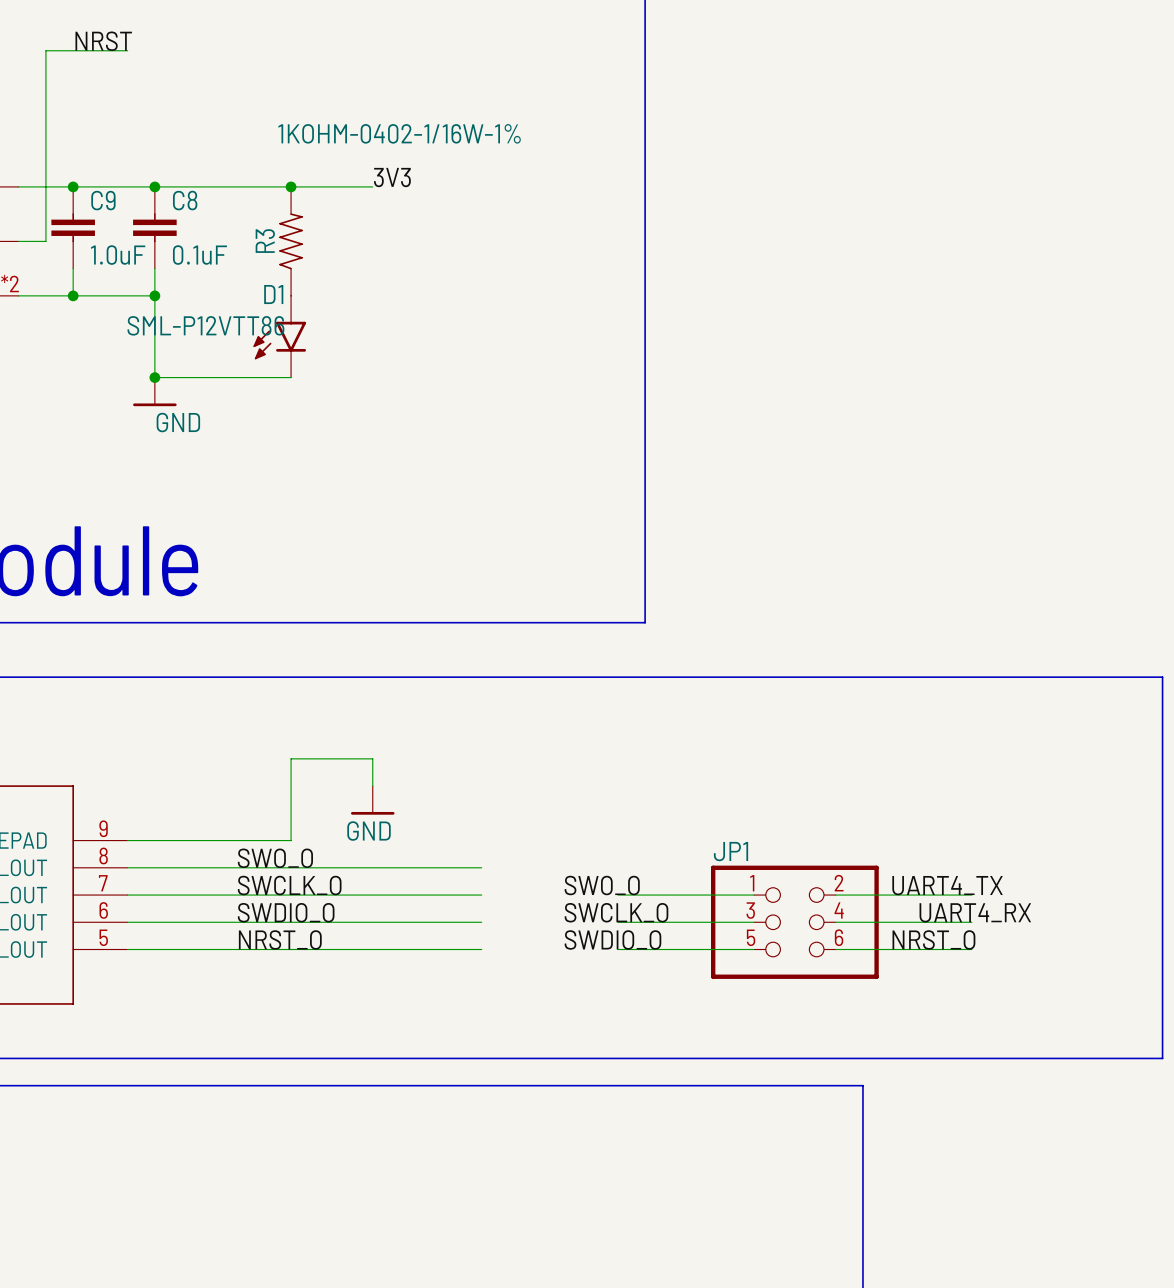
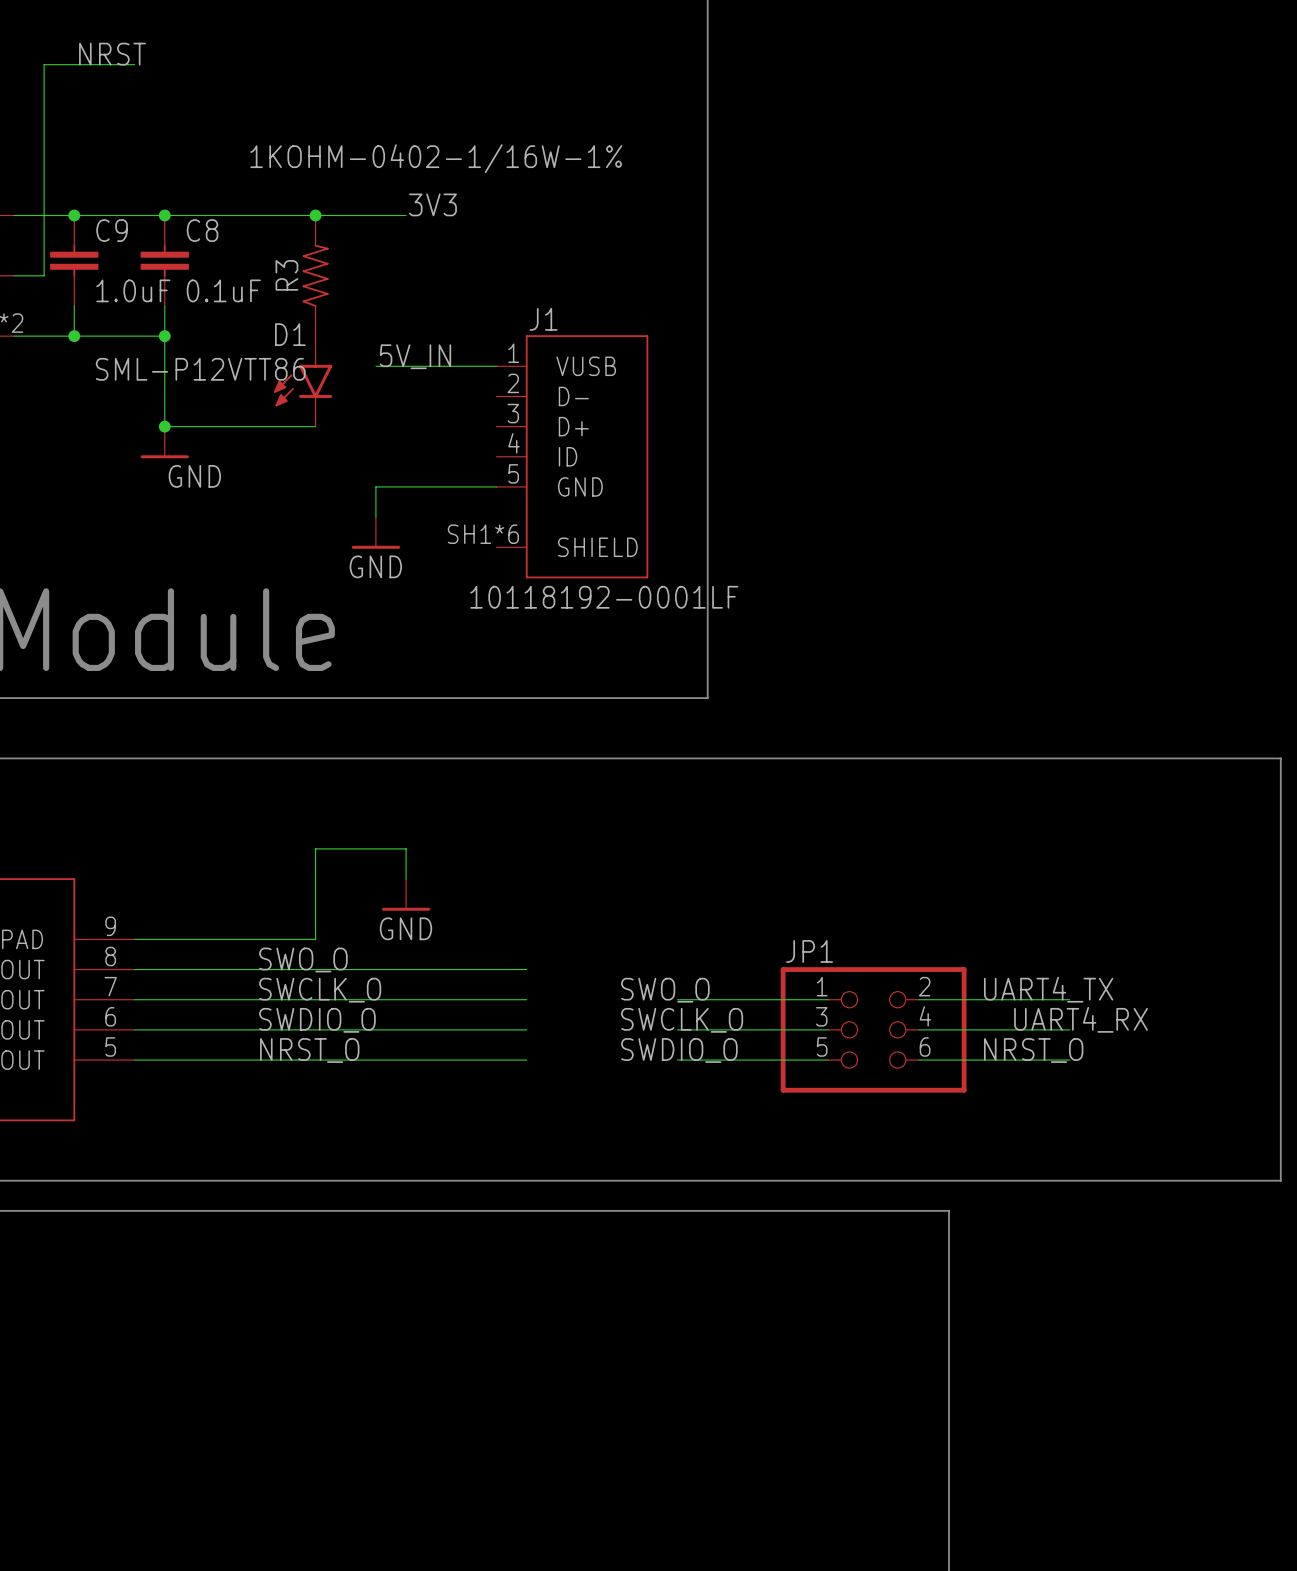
label: none -> 5V_IN (415, 356)
wire: none -> (375, 366) (496, 366)
J1: none -> 10118192-0001LF (572, 456)
wire: none -> (496, 486) (375, 486) (375, 517)
power symbol: none -> GND (375, 532)

